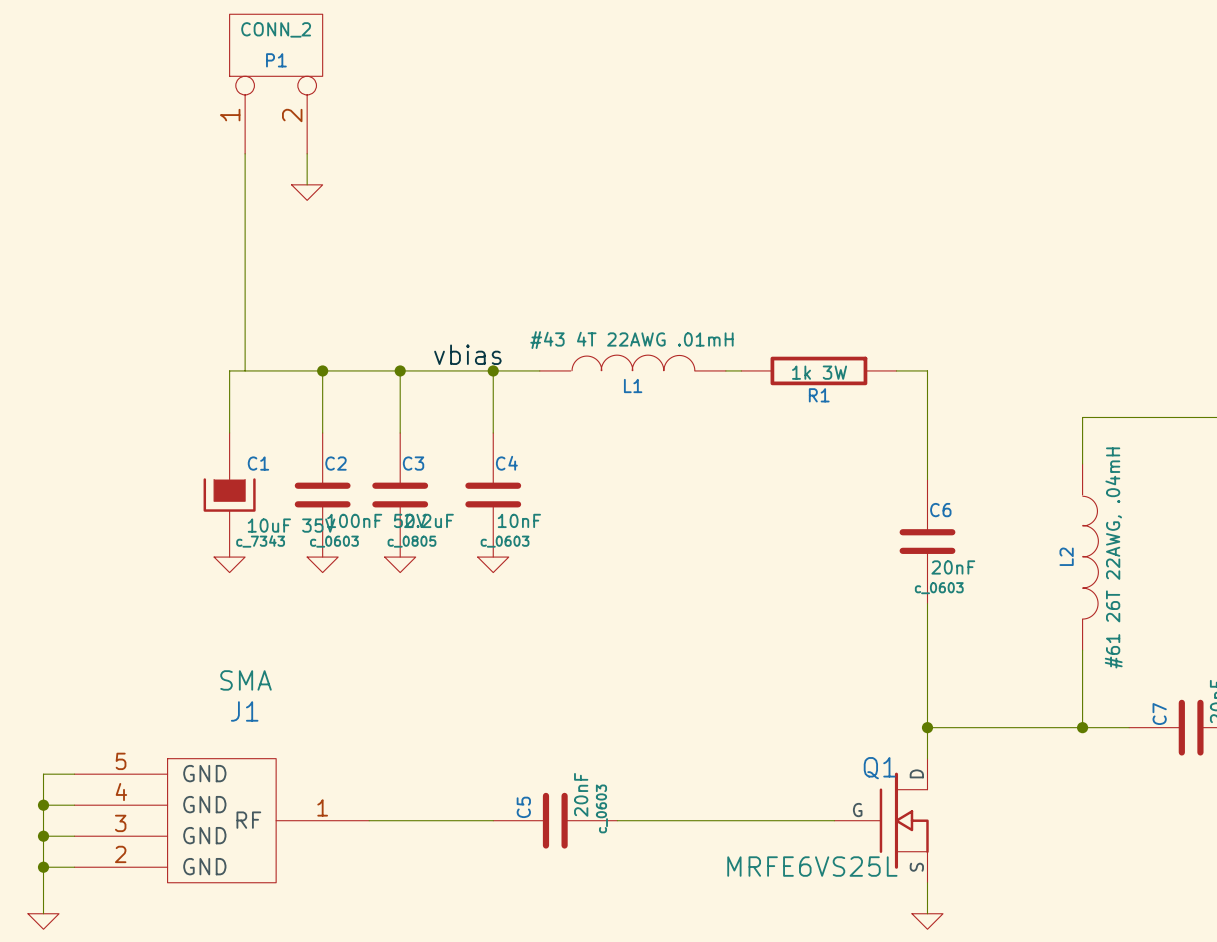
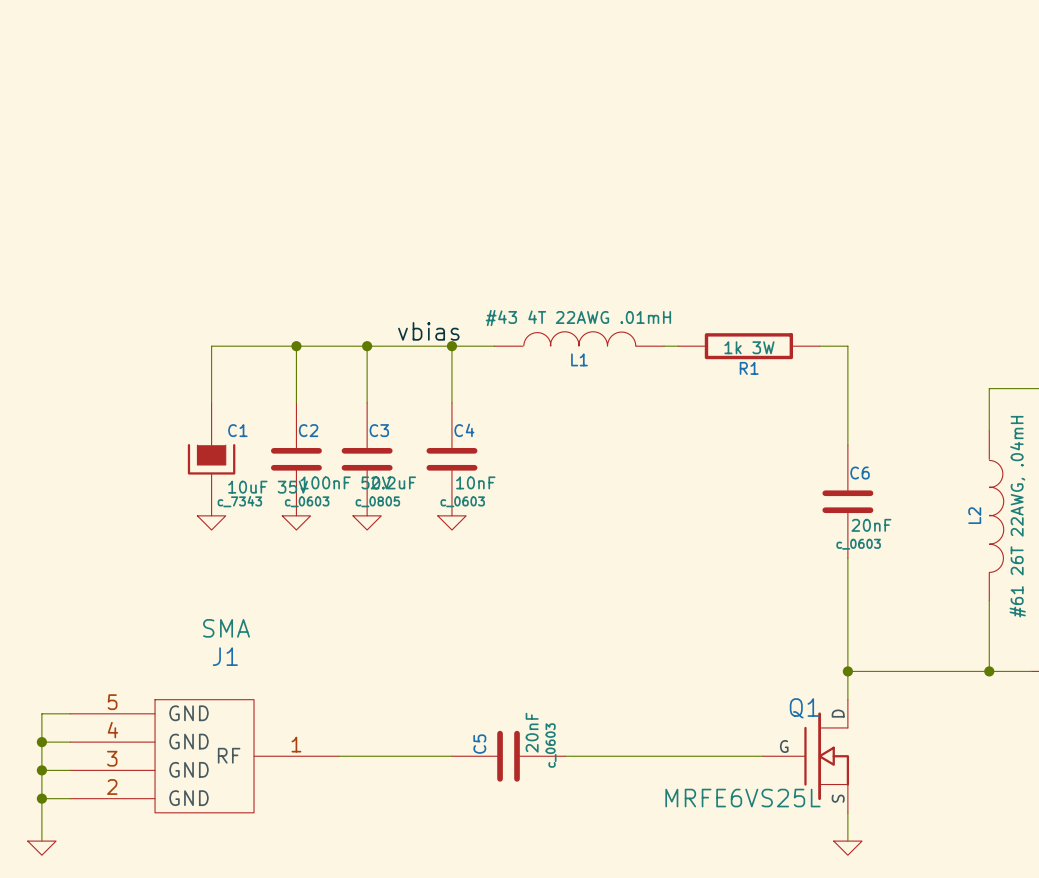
P1: CONN_2 (276, 84) -> none
wire: (245, 153) (245, 370) -> none
wire: (307, 153) (307, 184) -> none
power symbol: (307, 192) -> none

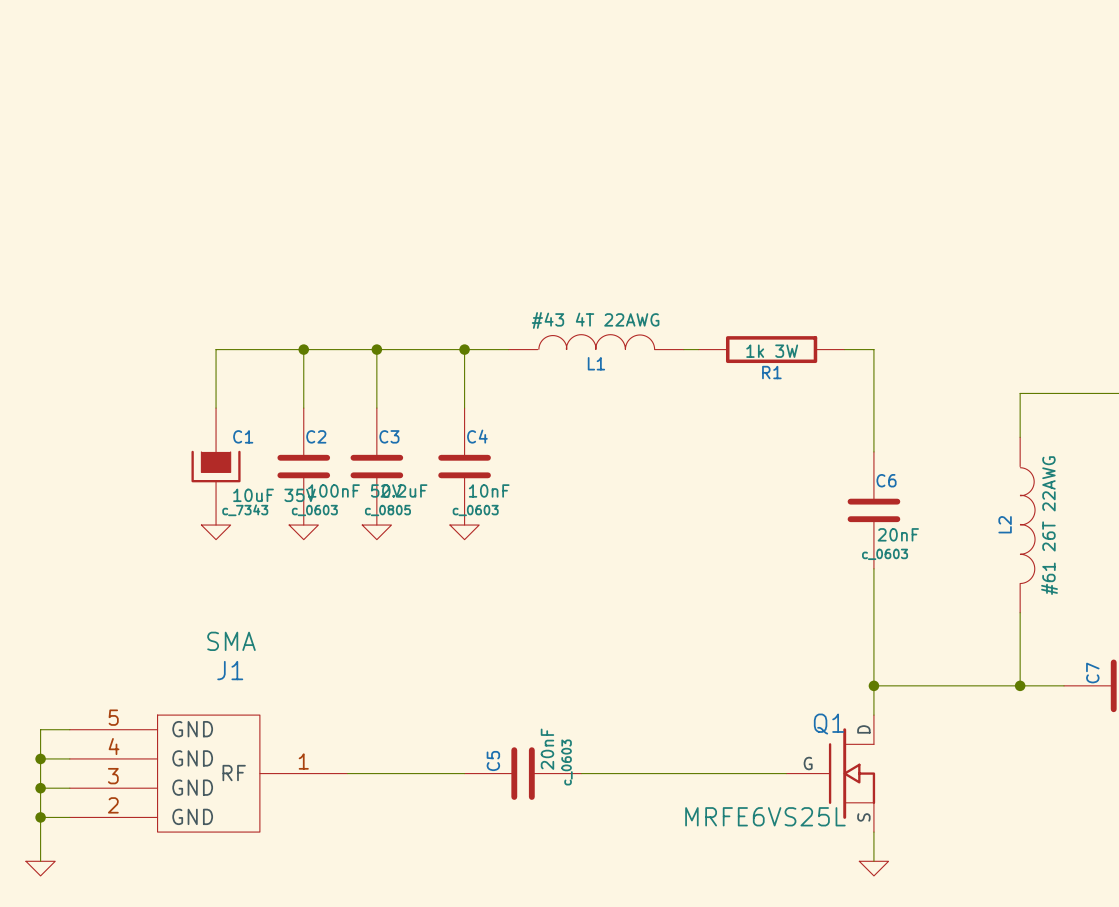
L1 value: #43 4T 22AWG .01mH (578, 318) -> #43 4T 22AWG (595, 320)
label: vbias (428, 331) -> none
L2 value: #61 26T 22AWG, .04mH (1017, 516) -> #61 26T 22AWG (1049, 525)

